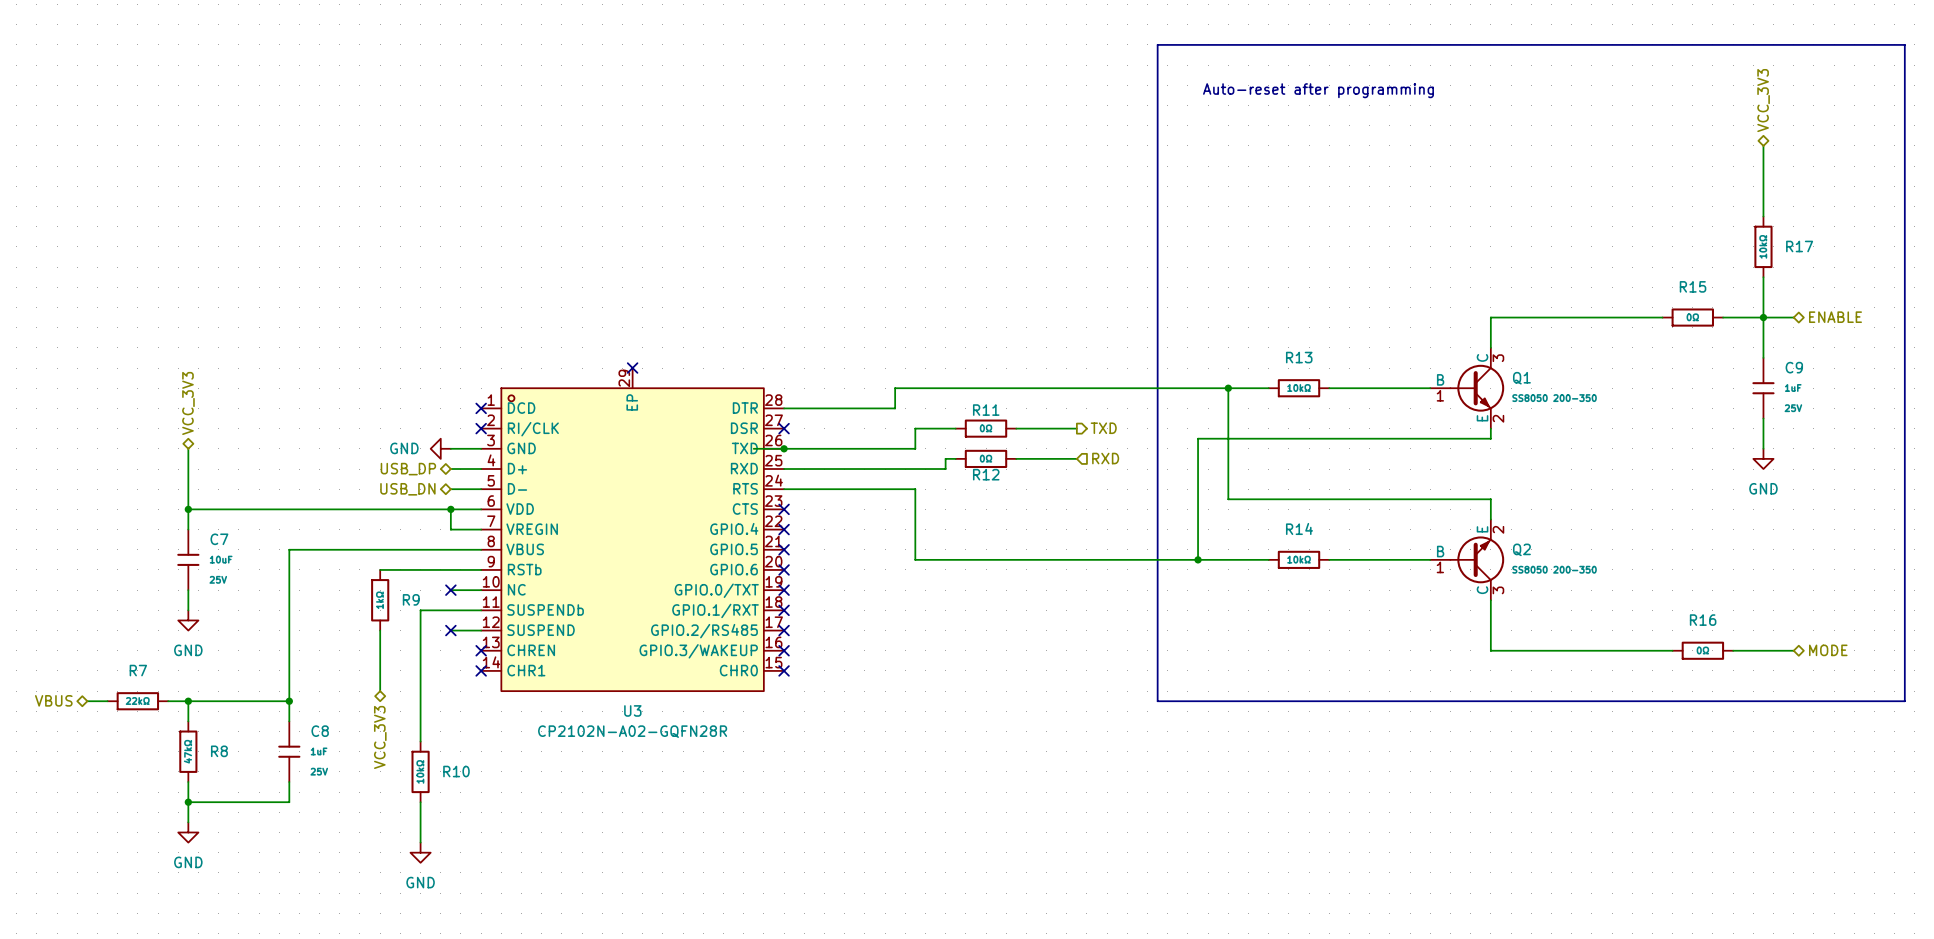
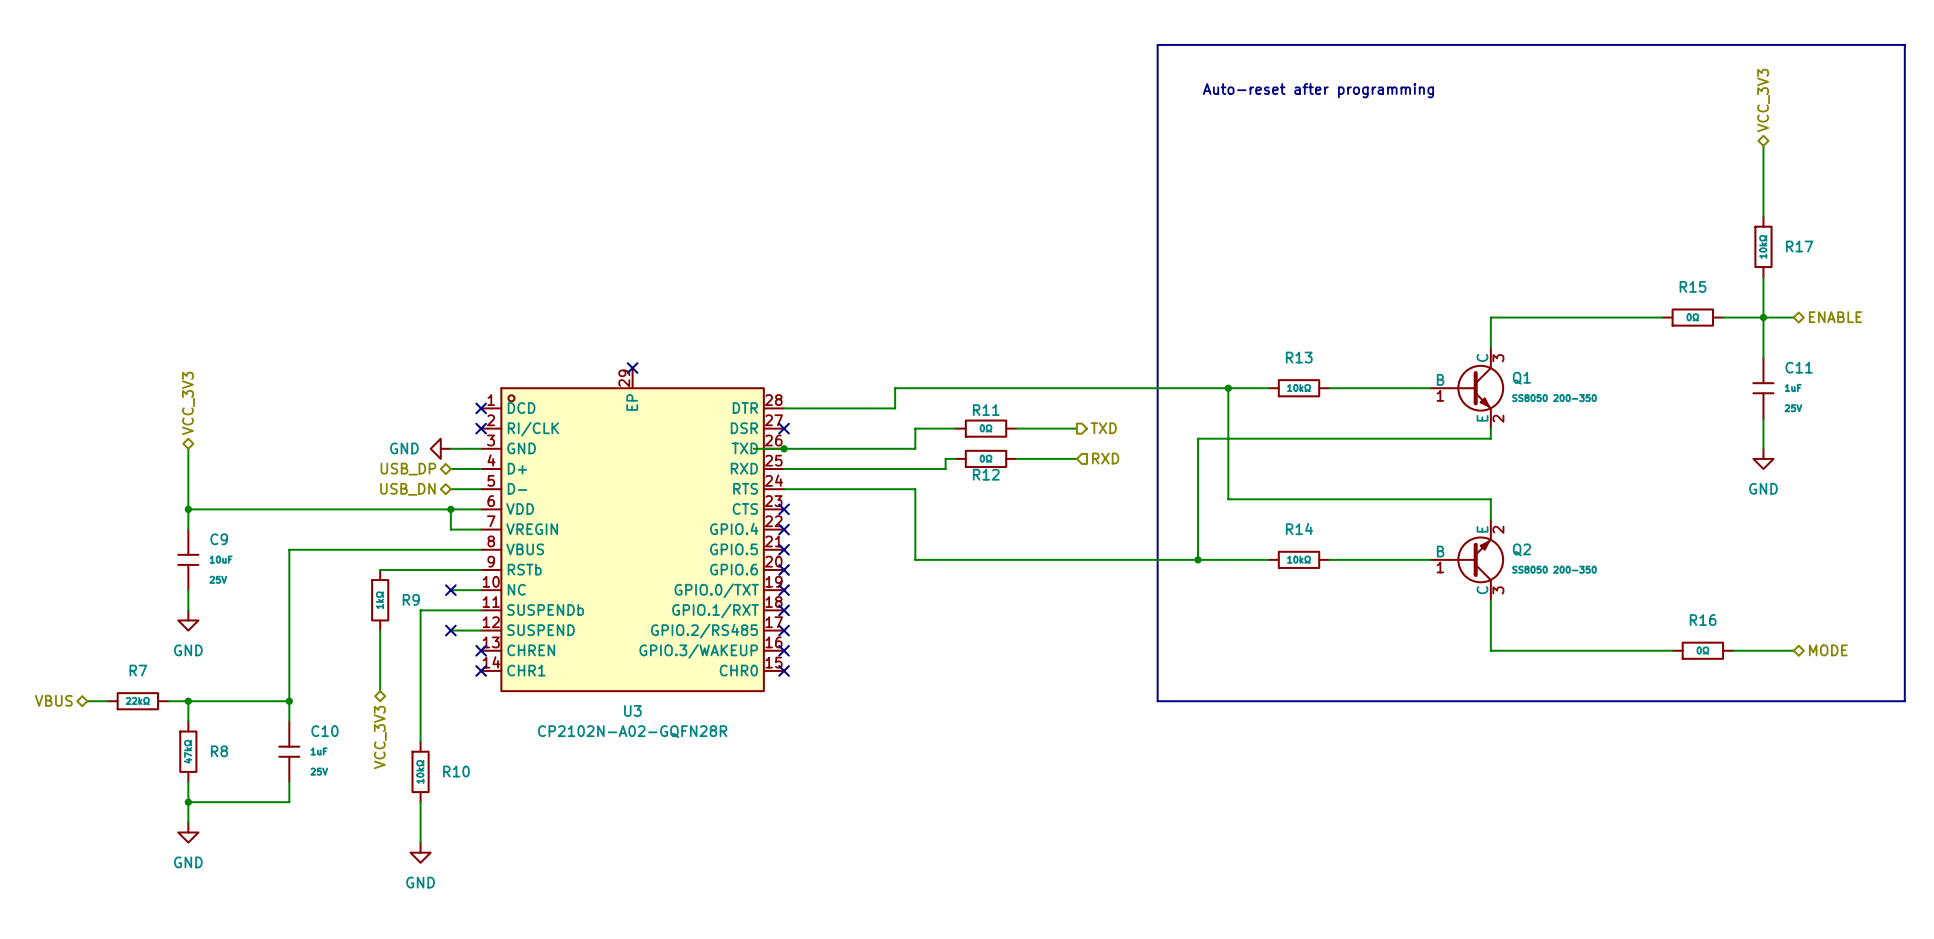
C9 name: C9 (1794, 367) -> C11 (1799, 367)
C7 name: C7 (219, 539) -> C9 (219, 539)
C8 name: C8 (320, 731) -> C10 (324, 731)

